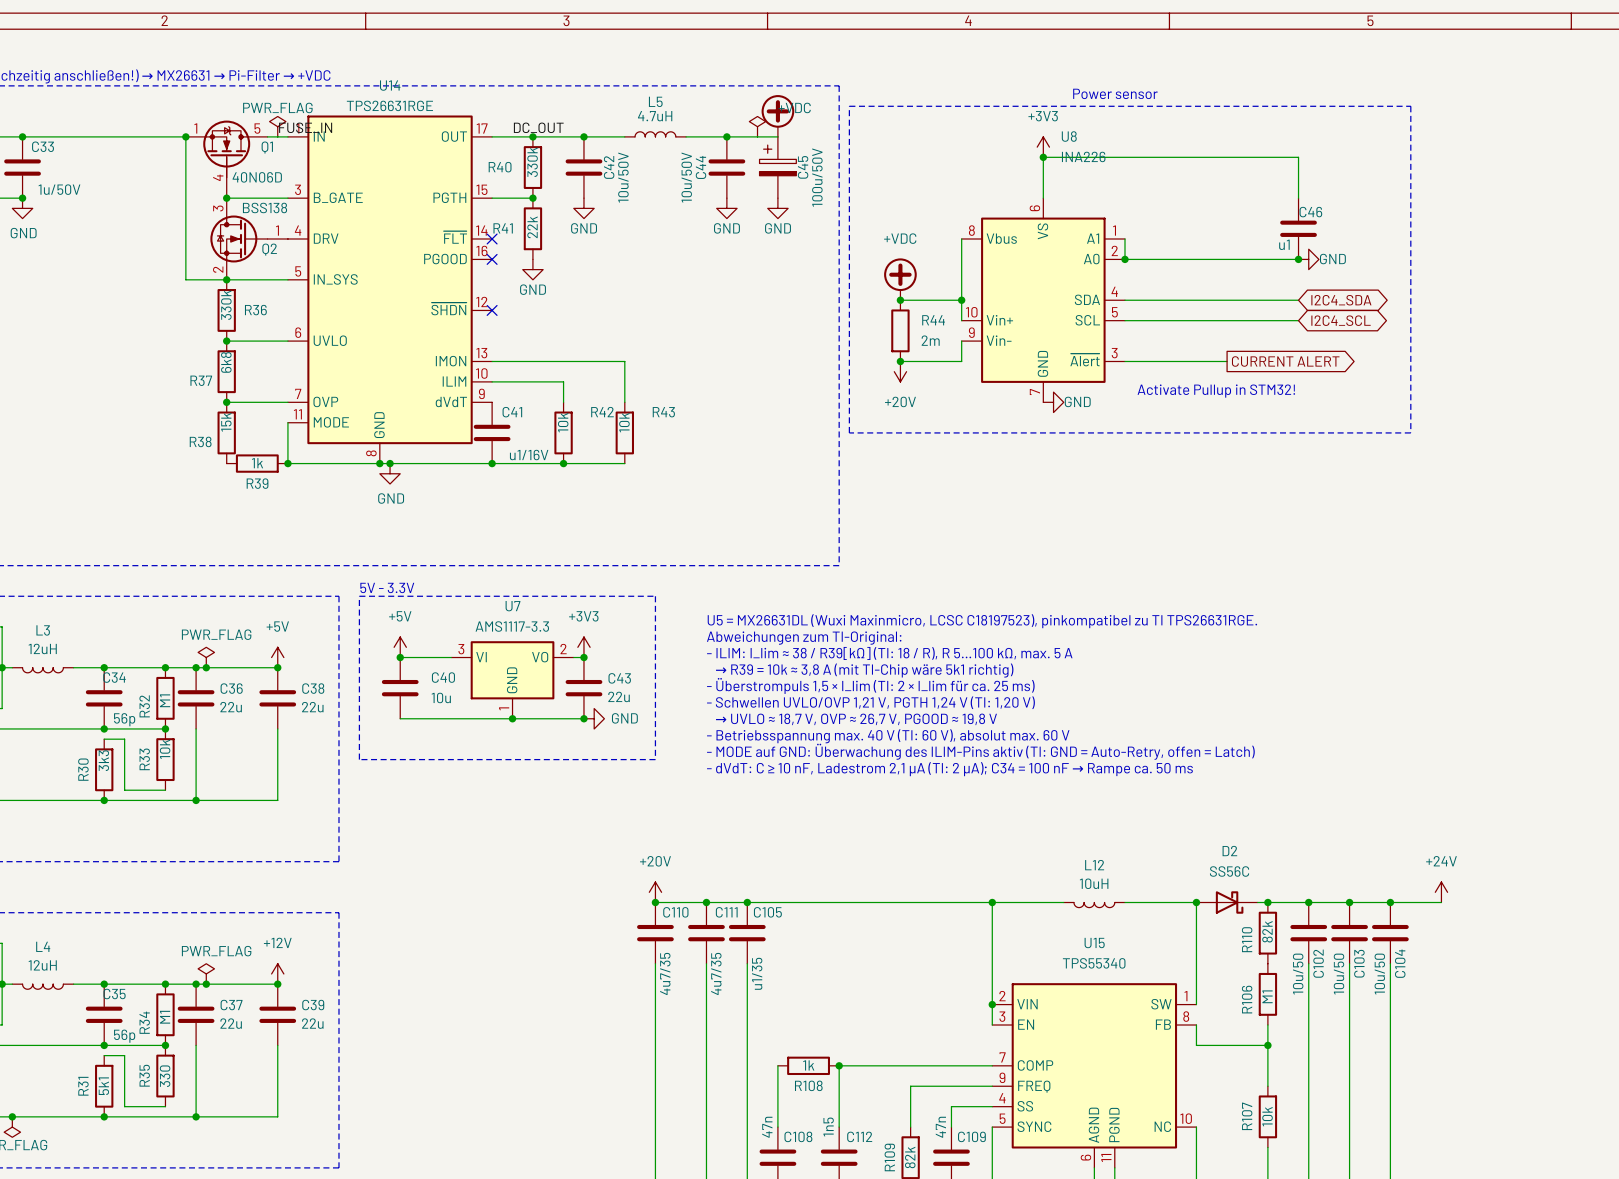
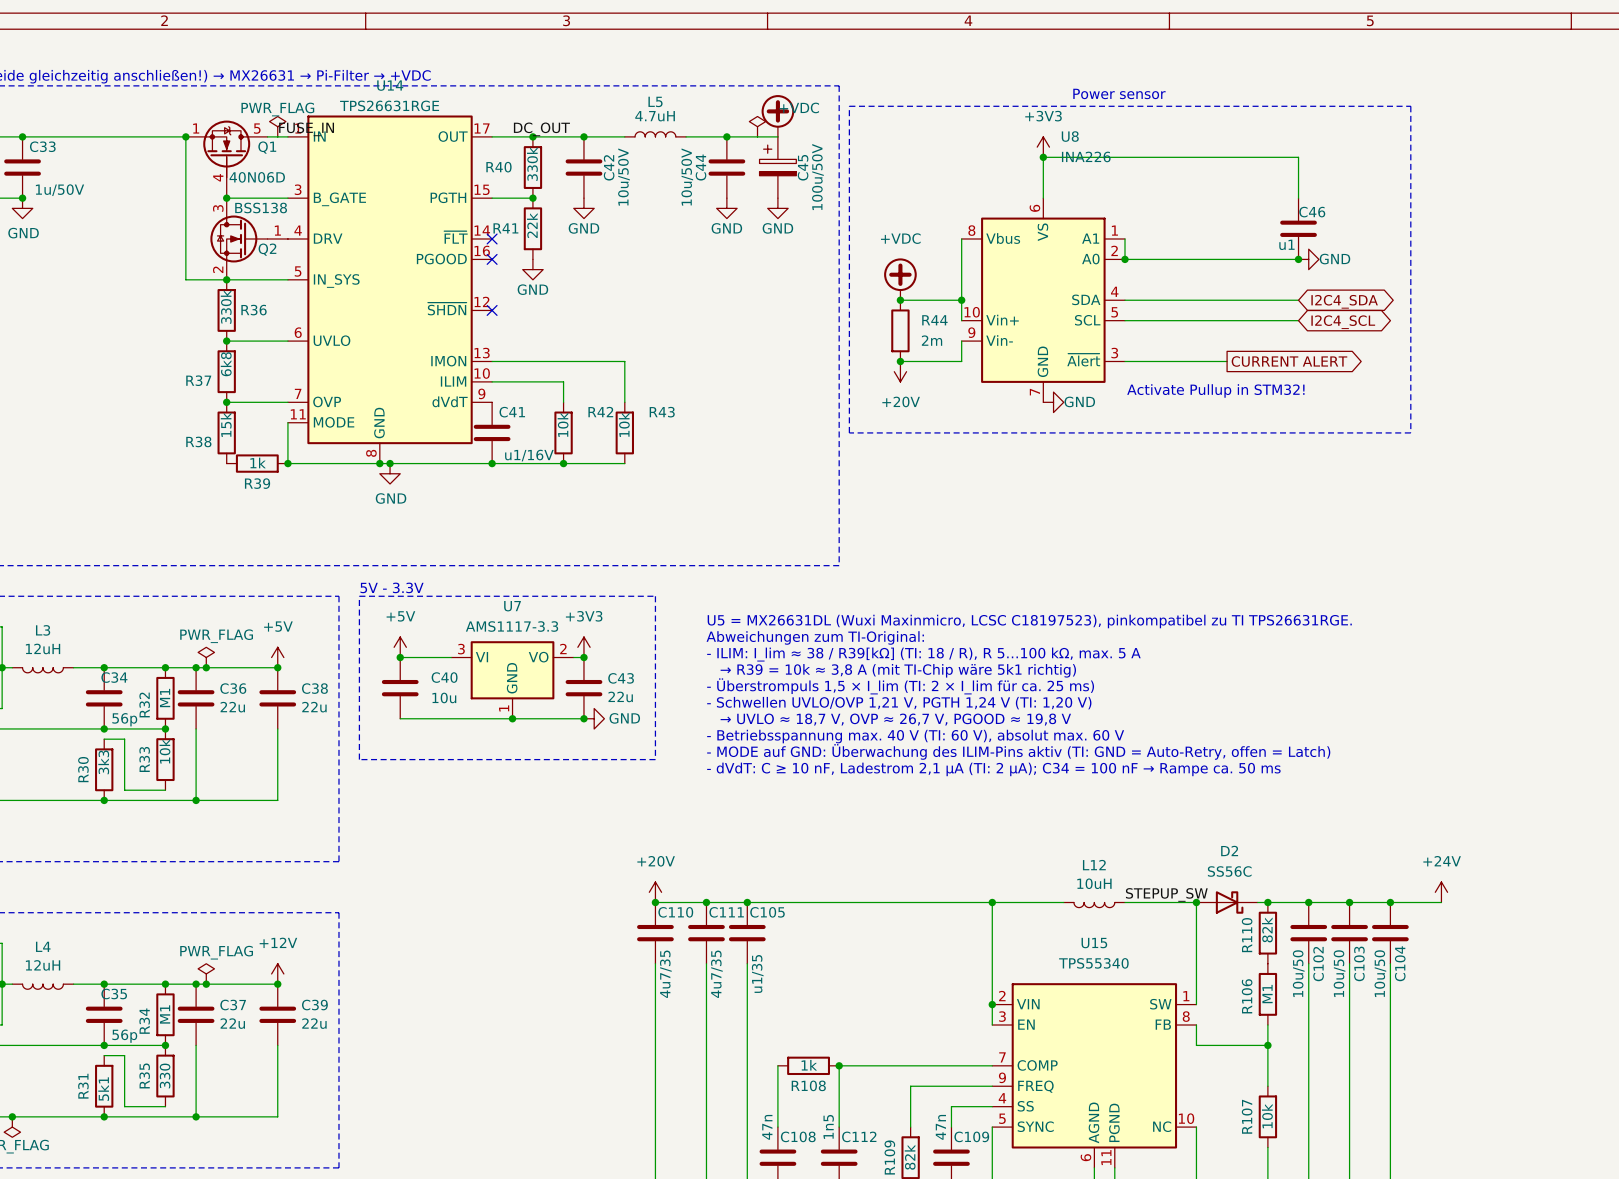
label: none -> STEPUP_SW (1166, 894)

